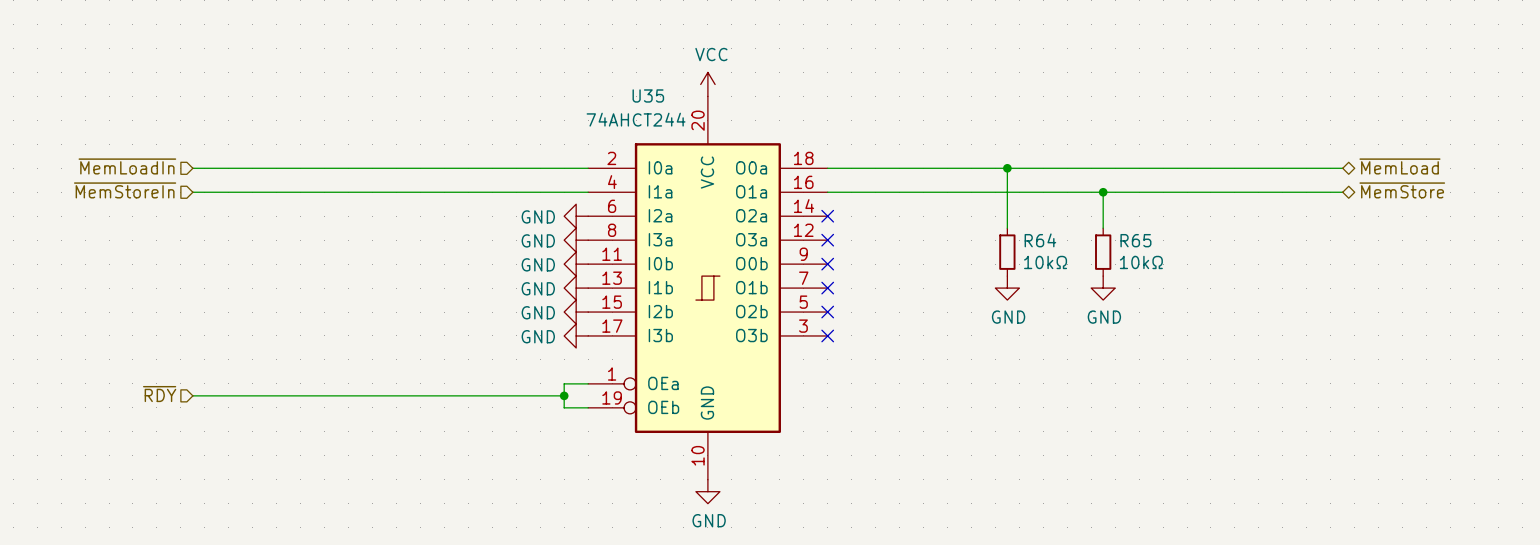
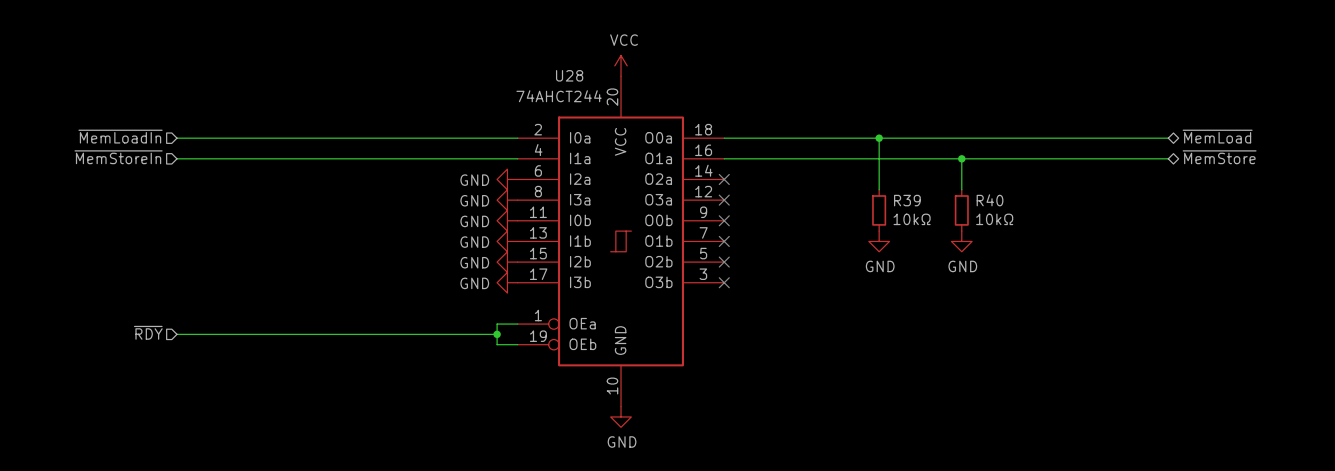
U35 name: U35 (648, 95) -> U28 (569, 75)
R64 name: R64 (1040, 240) -> R39 (907, 200)
R65 name: R65 (1135, 240) -> R40 (990, 200)

